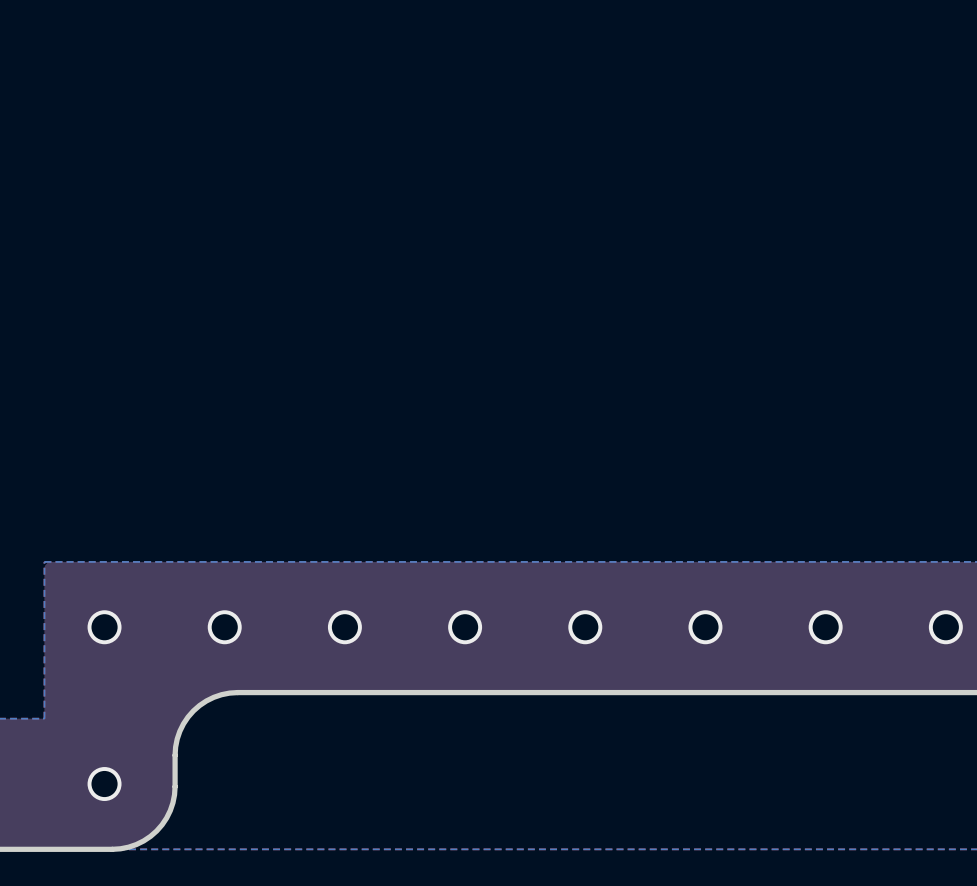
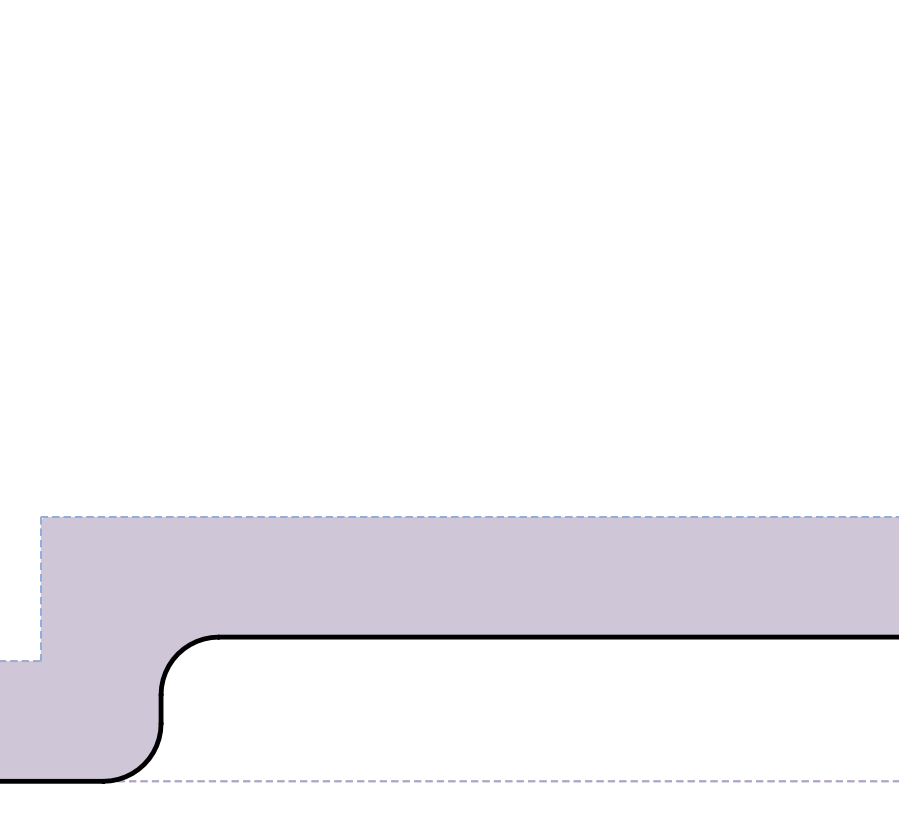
via: (104, 627) -> none
via: (224, 627) -> none
via: (344, 627) -> none
via: (465, 627) -> none
via: (585, 627) -> none
via: (705, 627) -> none
via: (825, 627) -> none
via: (945, 627) -> none
via: (104, 784) -> none

